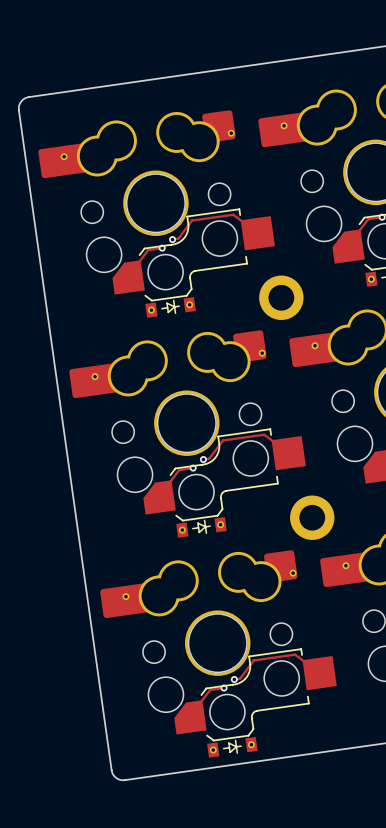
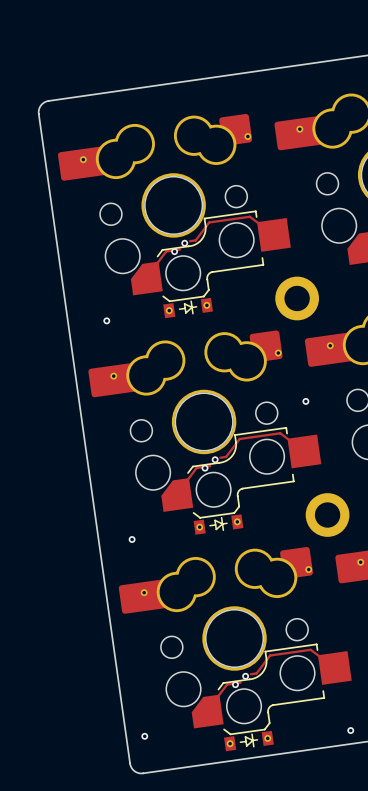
via: (172, 239) -> none
via: none -> (184, 243)
via: (162, 248) -> none
via: none -> (174, 251)
via: none -> (106, 320)
via: none -> (305, 401)
via: (203, 459) -> none
via: none -> (215, 459)
via: (193, 468) -> none
via: none -> (205, 468)
via: none -> (132, 539)
via: (234, 679) -> none
via: none -> (245, 676)
via: (224, 688) -> none
via: none -> (235, 684)
via: none -> (350, 730)
via: none -> (144, 736)

